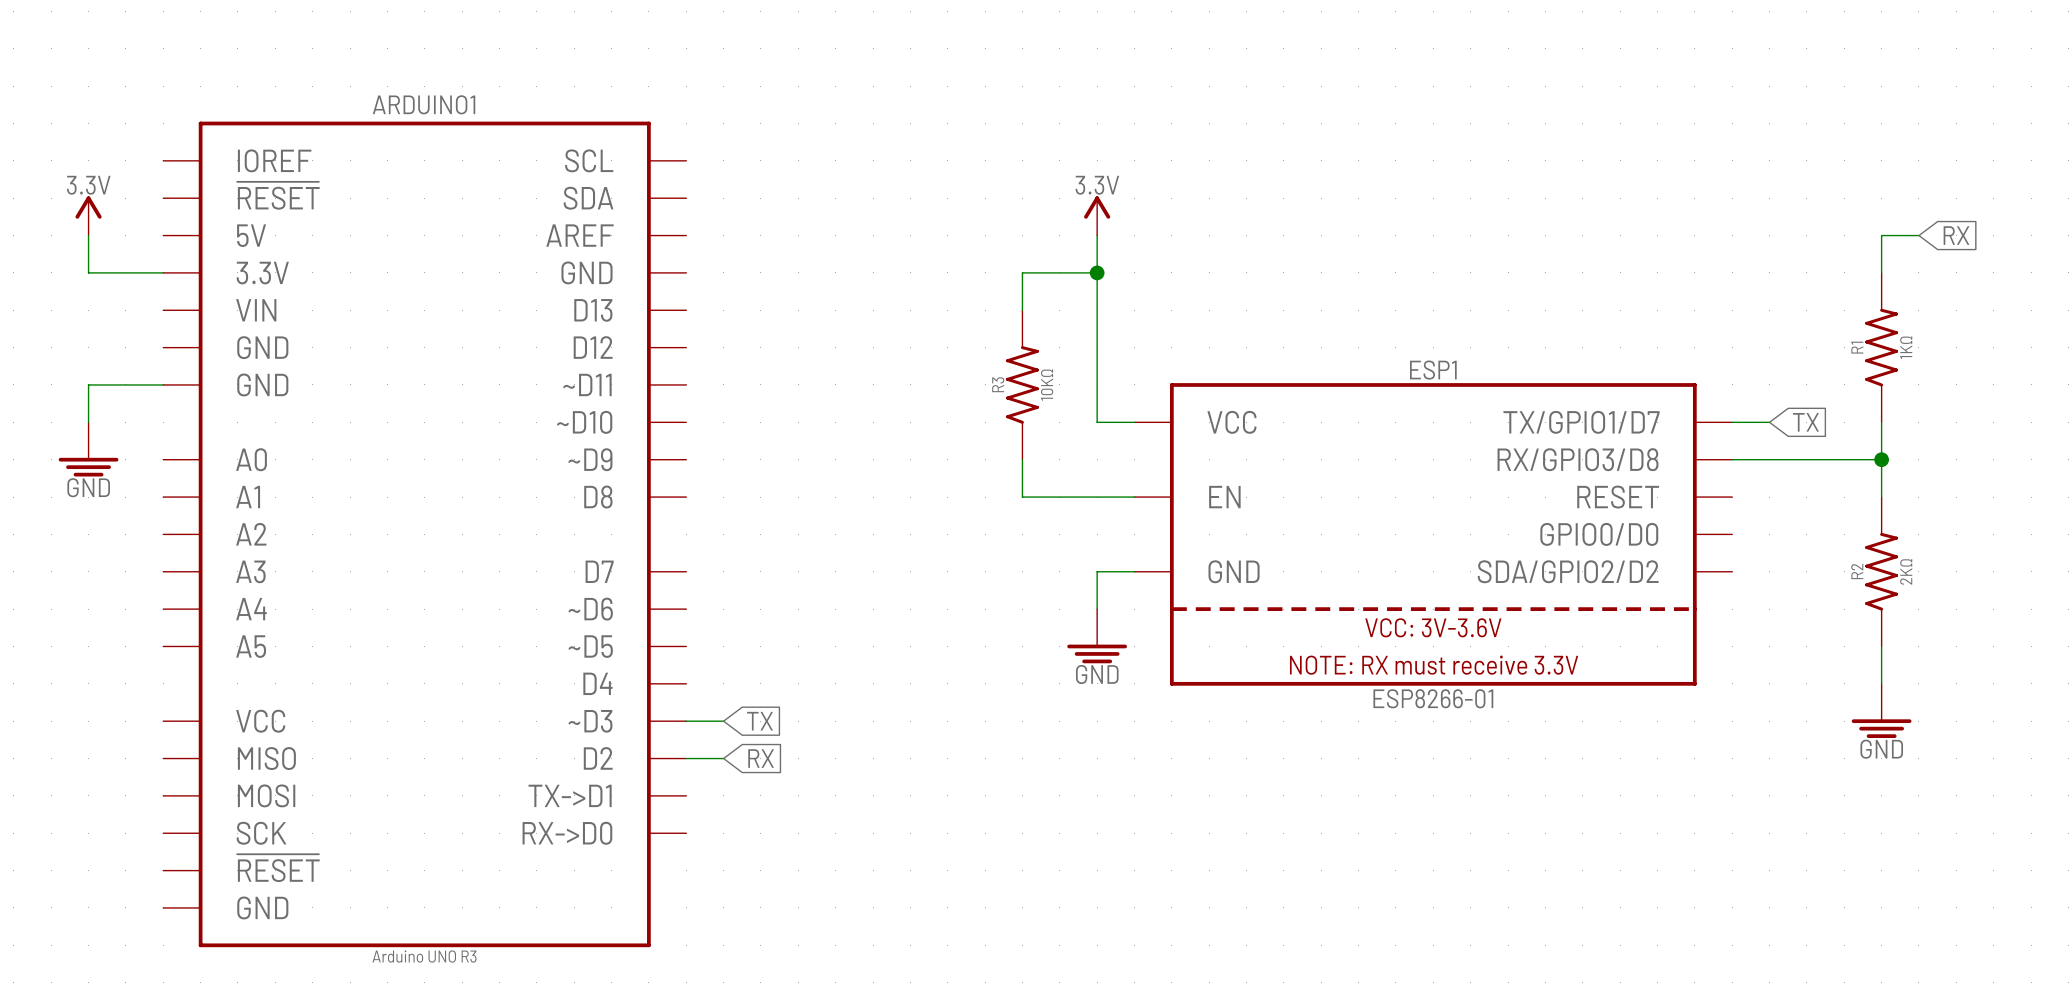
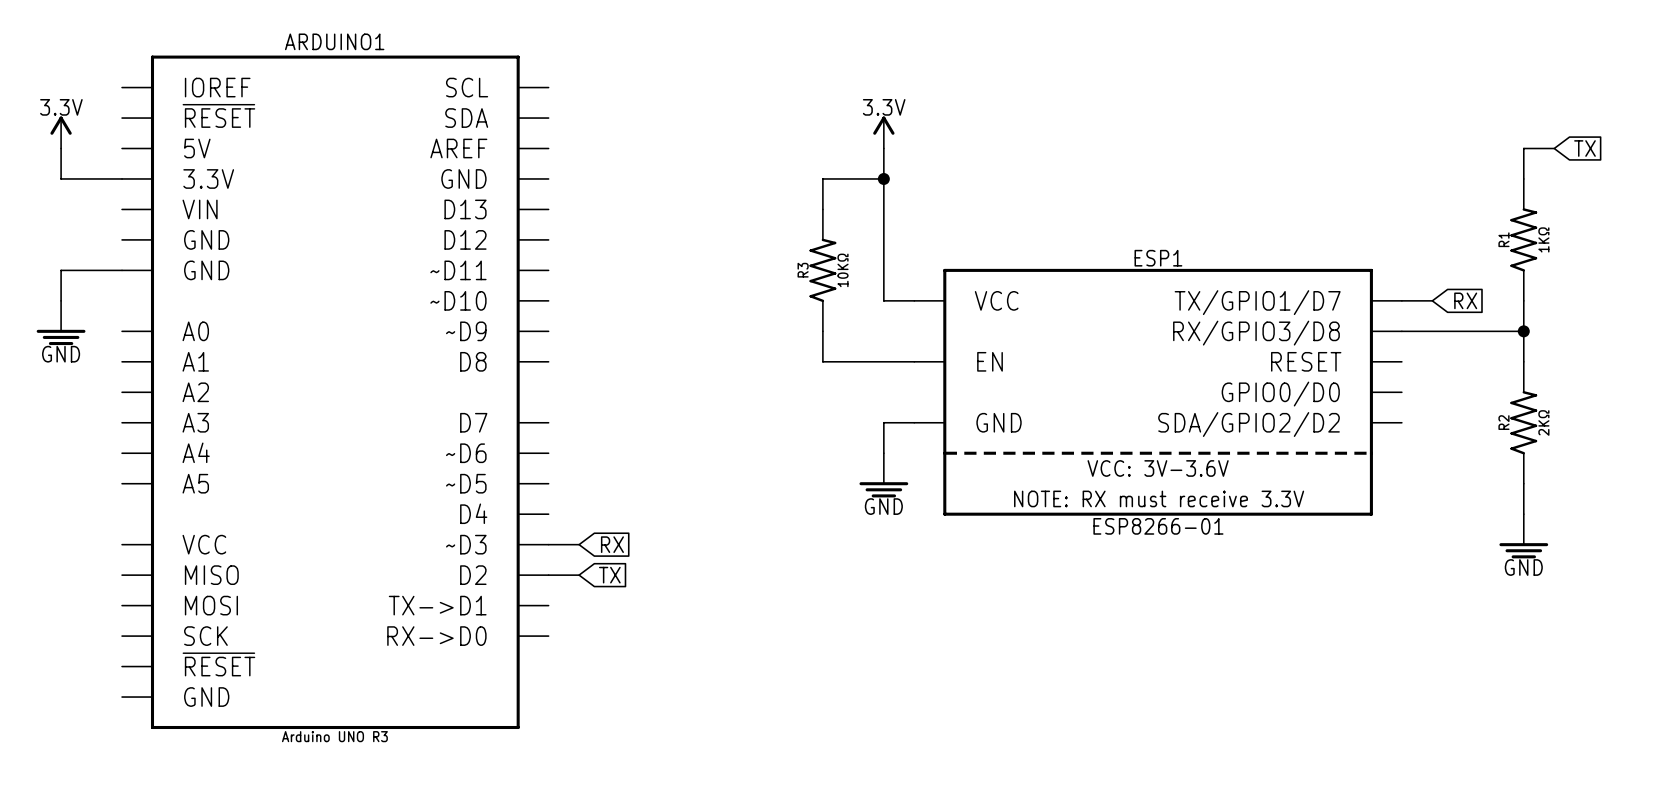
global label: RX (1956, 235) -> TX (1584, 148)
global label: TX (1805, 422) -> RX (1465, 300)
global label: TX (759, 721) -> RX (612, 544)
global label: RX (761, 758) -> TX (609, 575)

